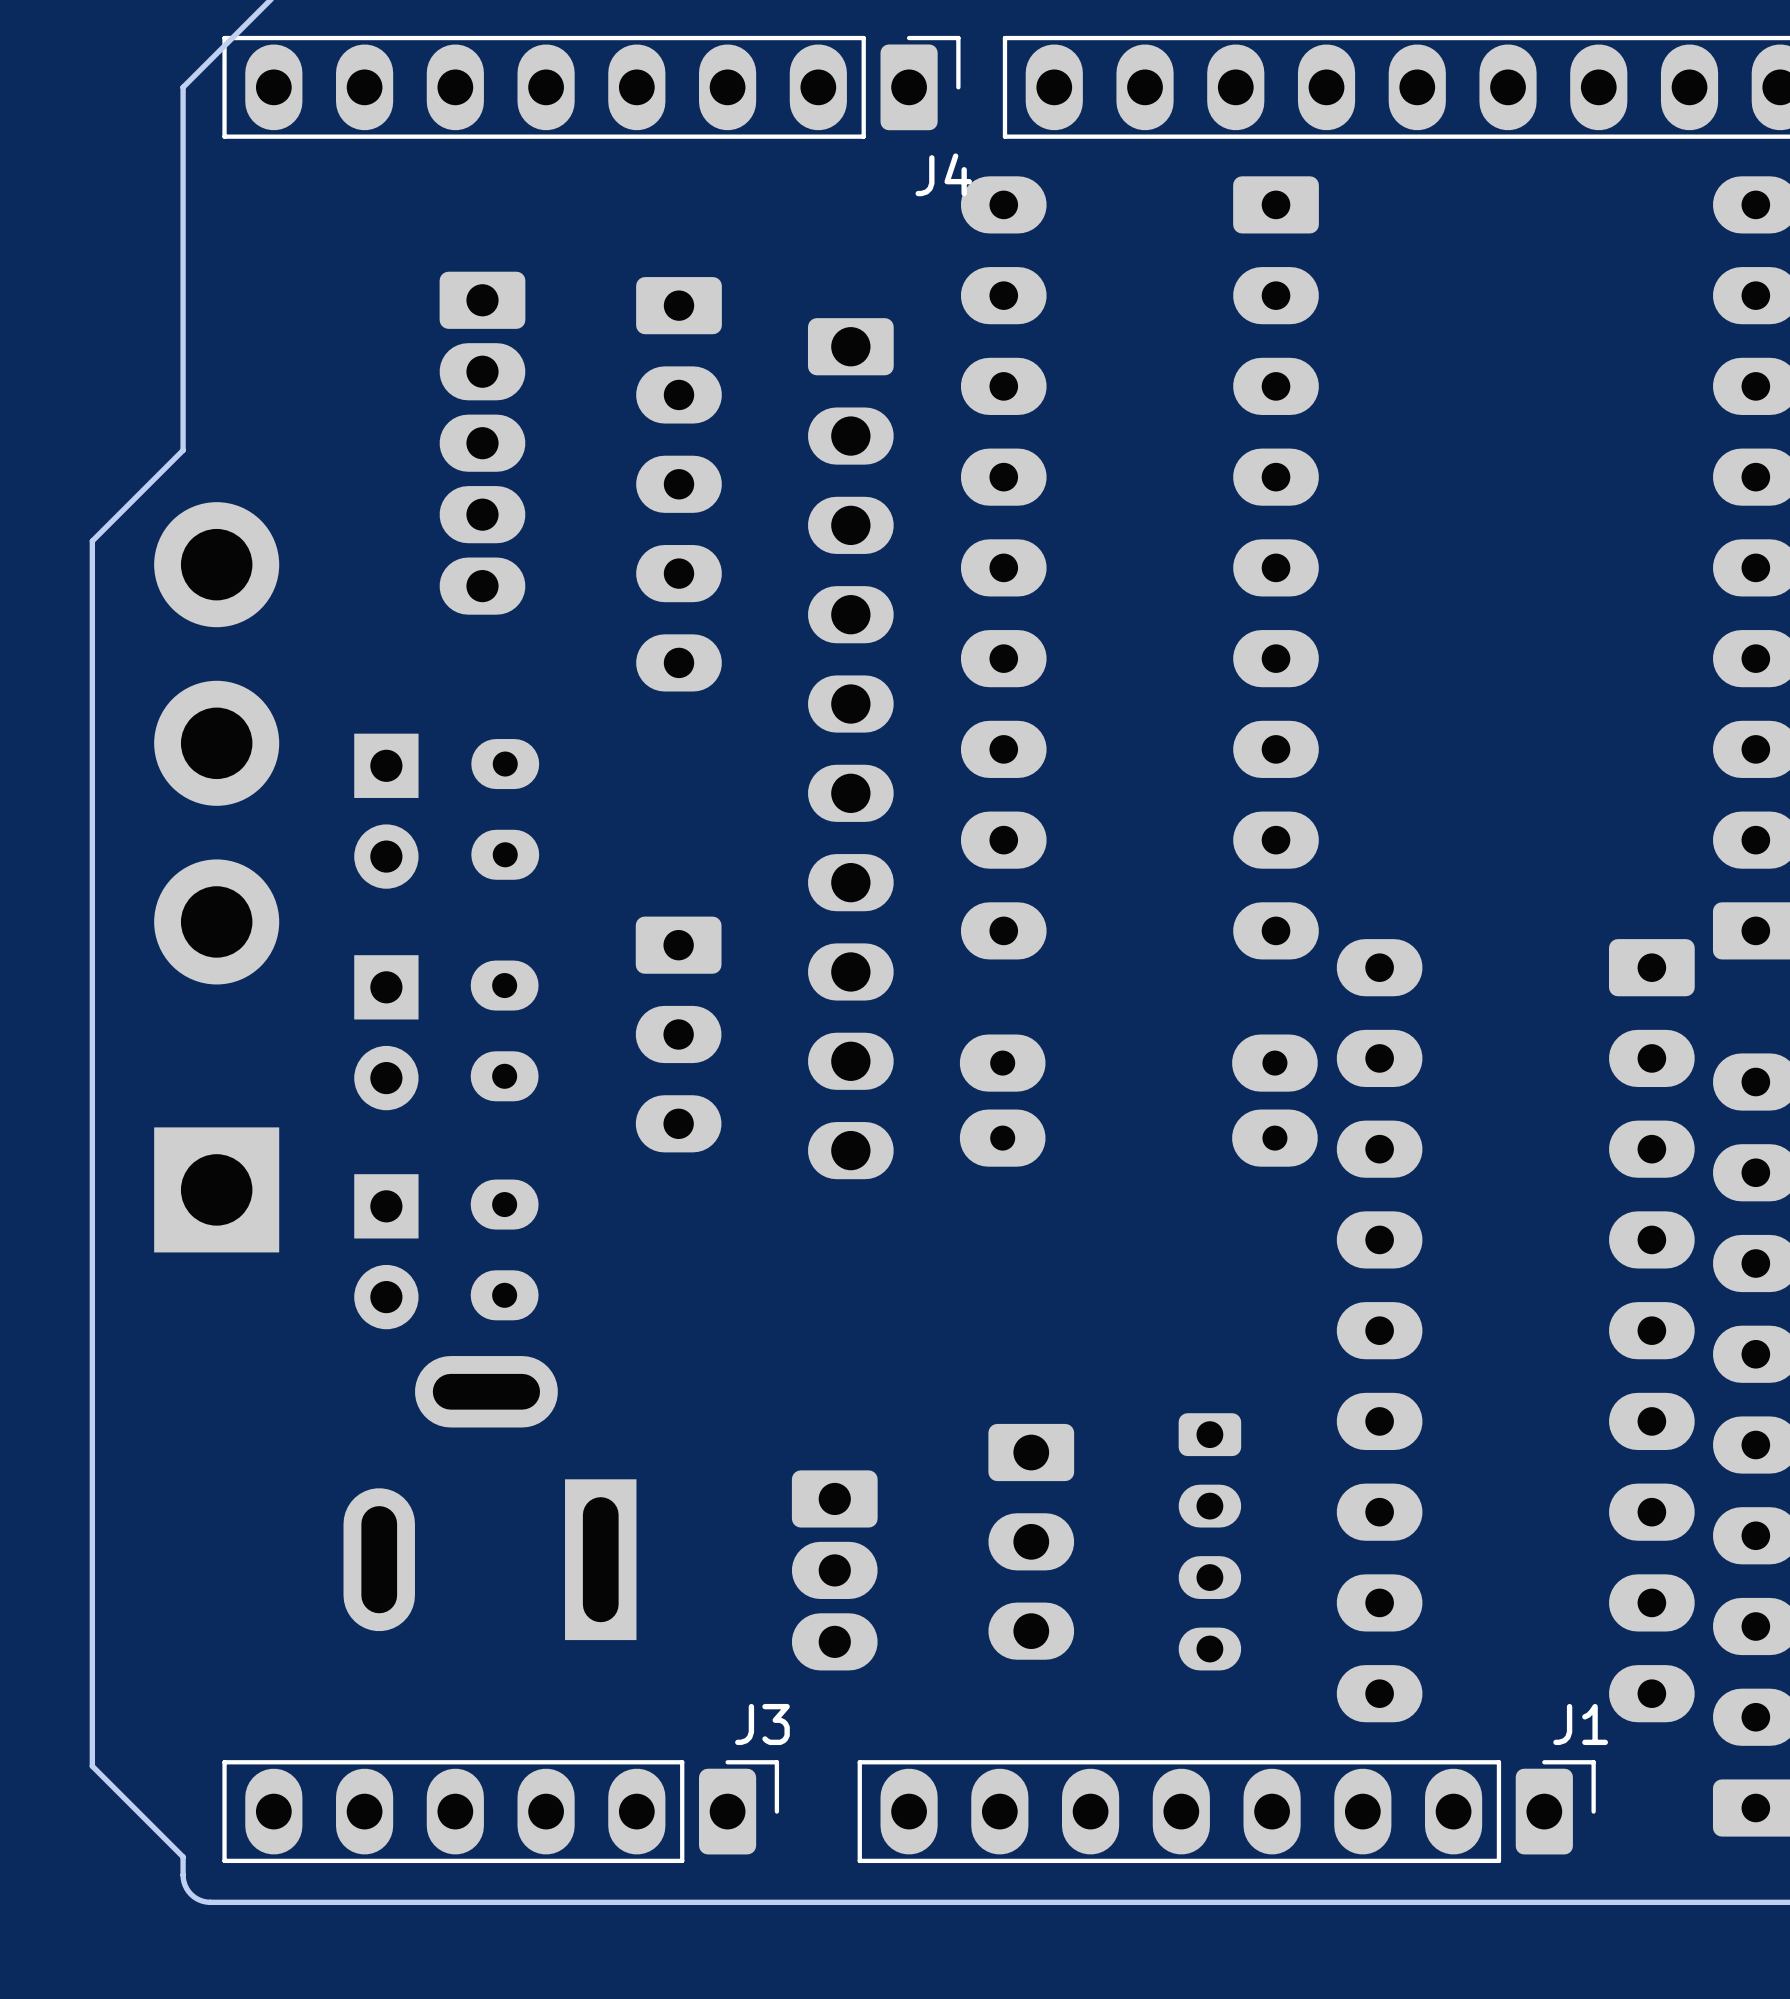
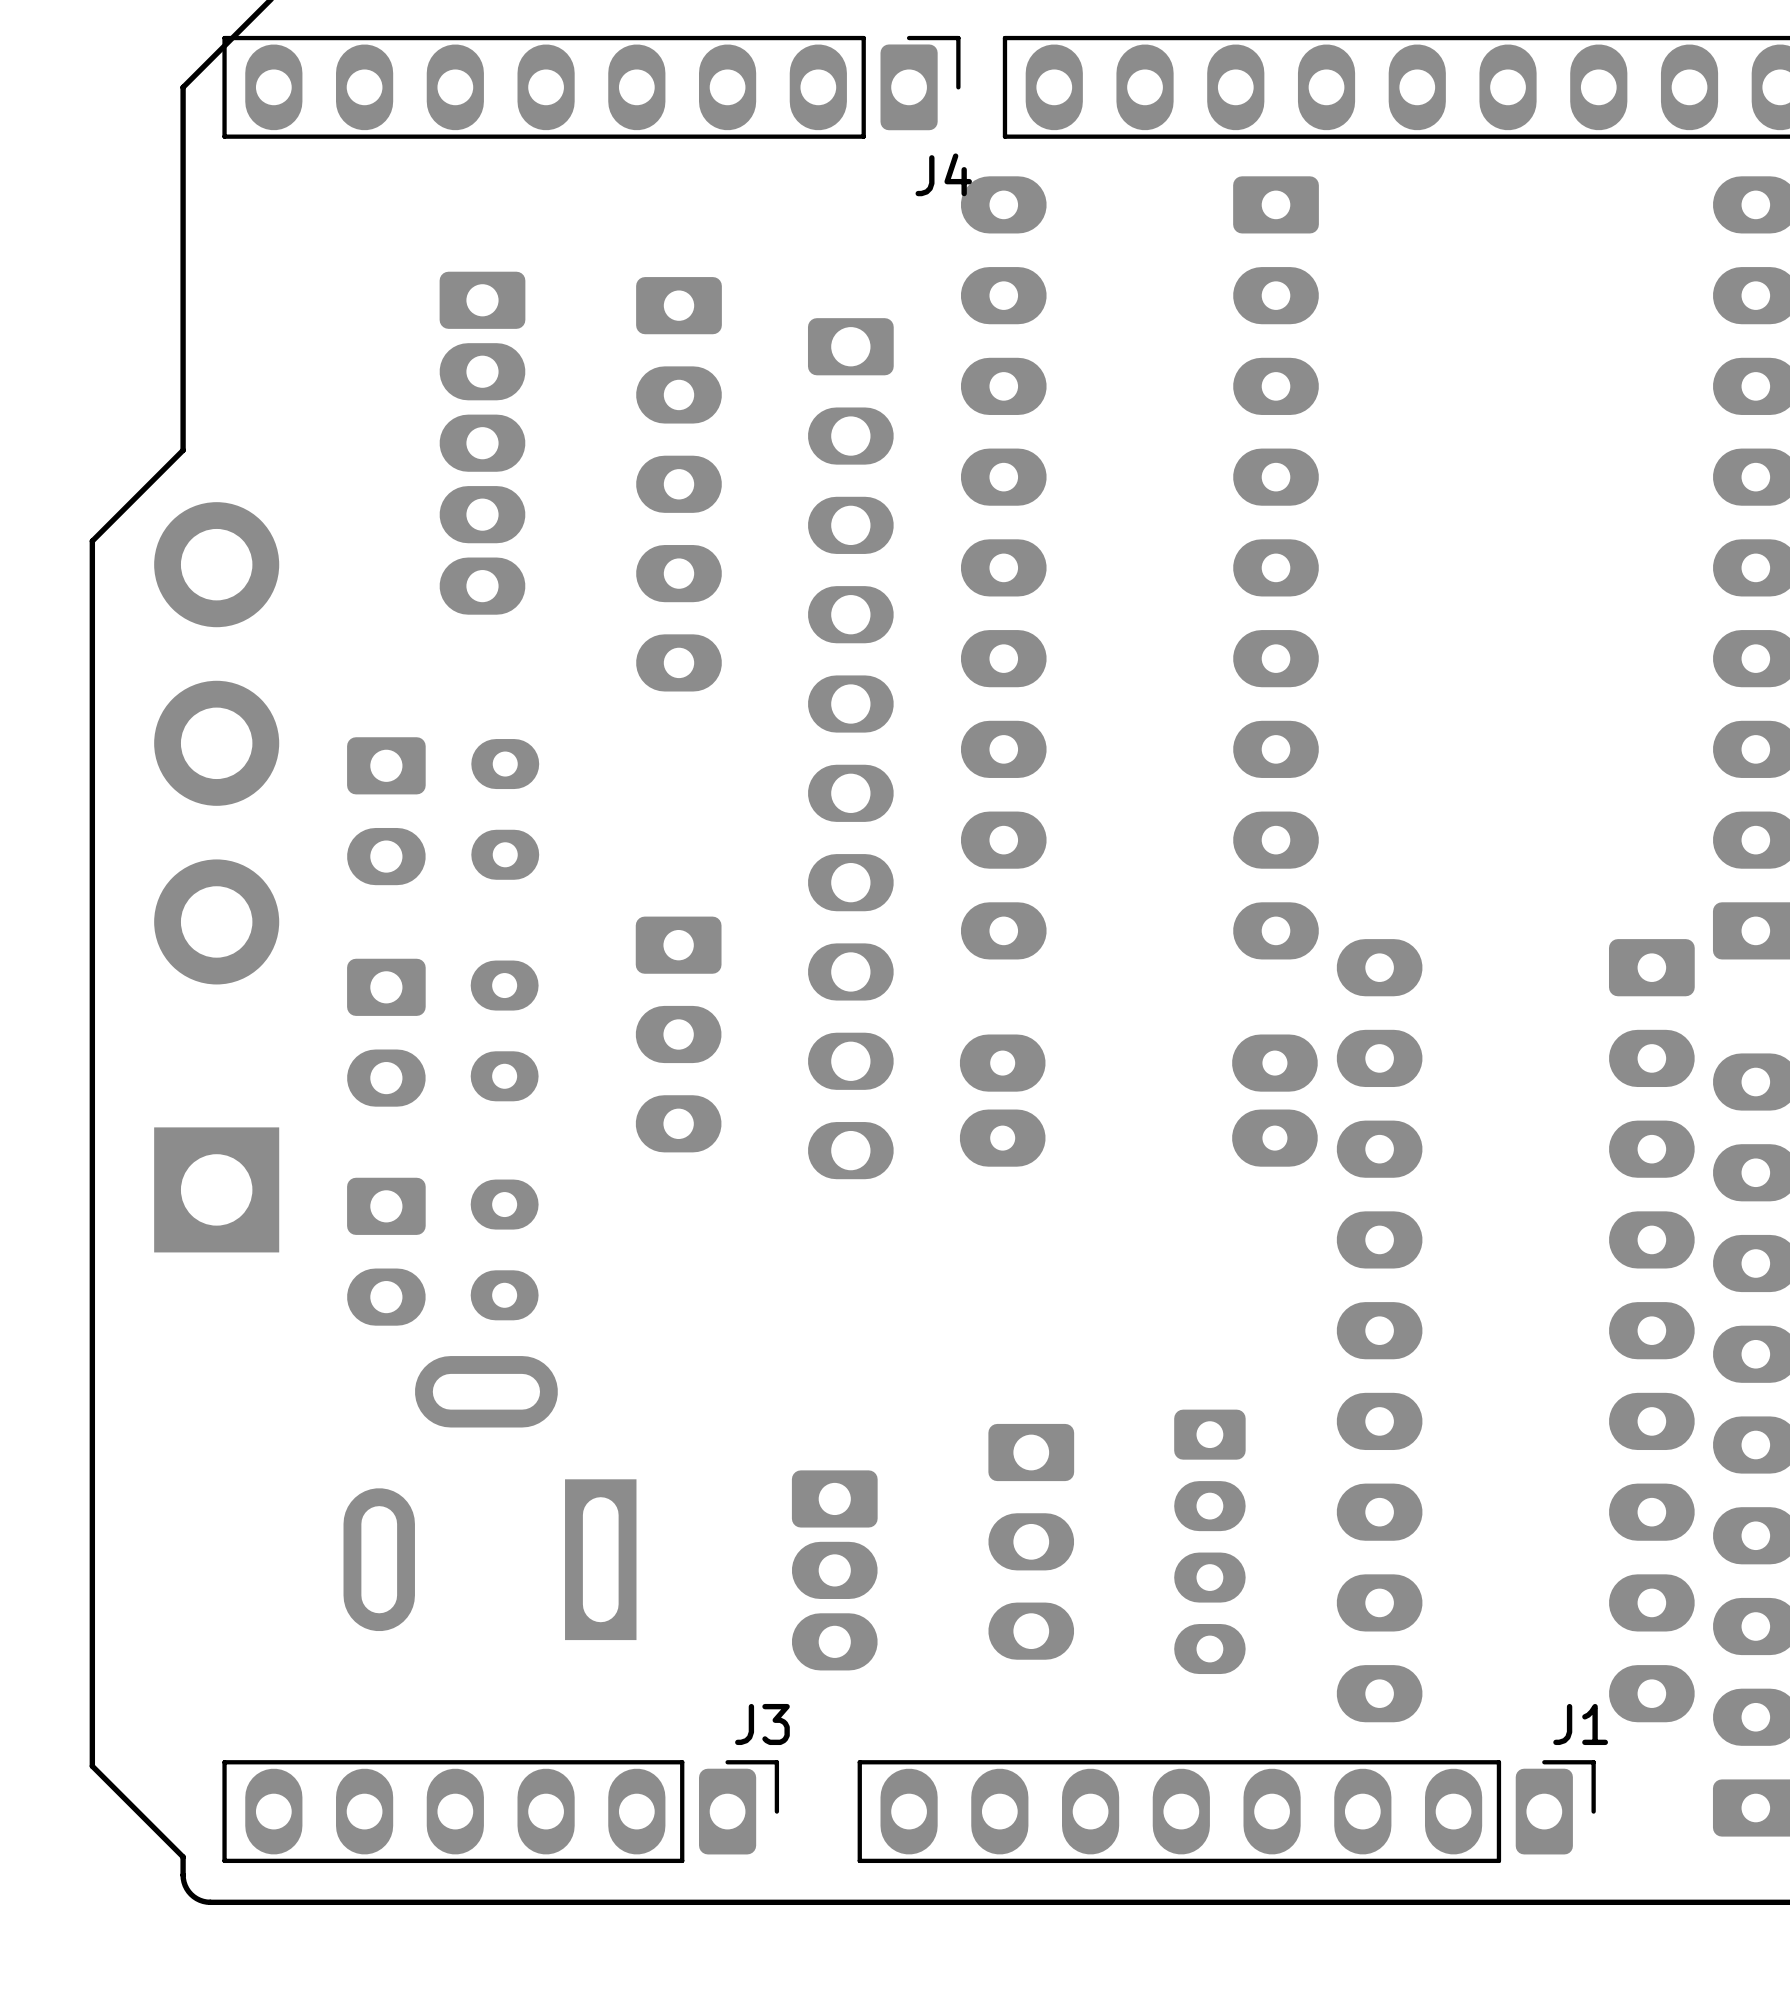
part footprint: [354, 733, 419, 889] -> [347, 737, 426, 886]
part footprint: [354, 955, 419, 1111] -> [347, 958, 426, 1107]
part footprint: [354, 1174, 419, 1330] -> [347, 1177, 426, 1326]
part footprint: [1178, 1413, 1242, 1671] -> [1174, 1409, 1246, 1675]

